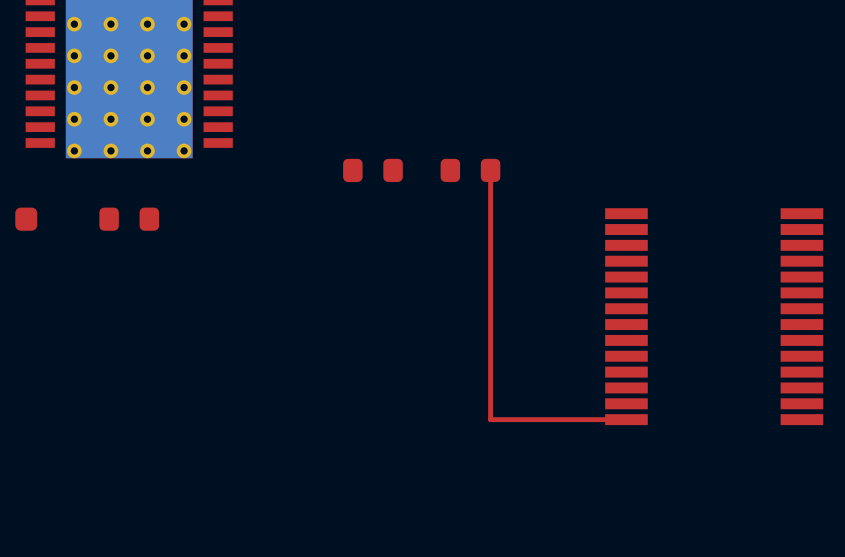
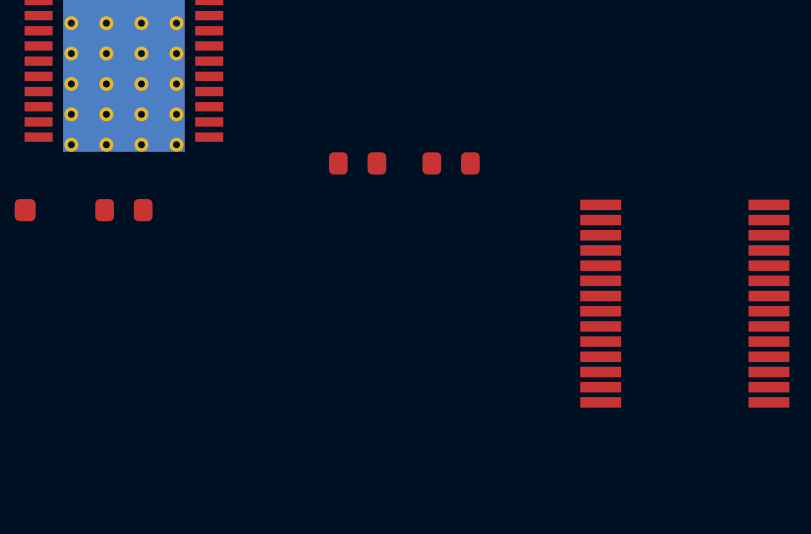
top track: (490, 170) (490, 419) (626, 419) -> none

